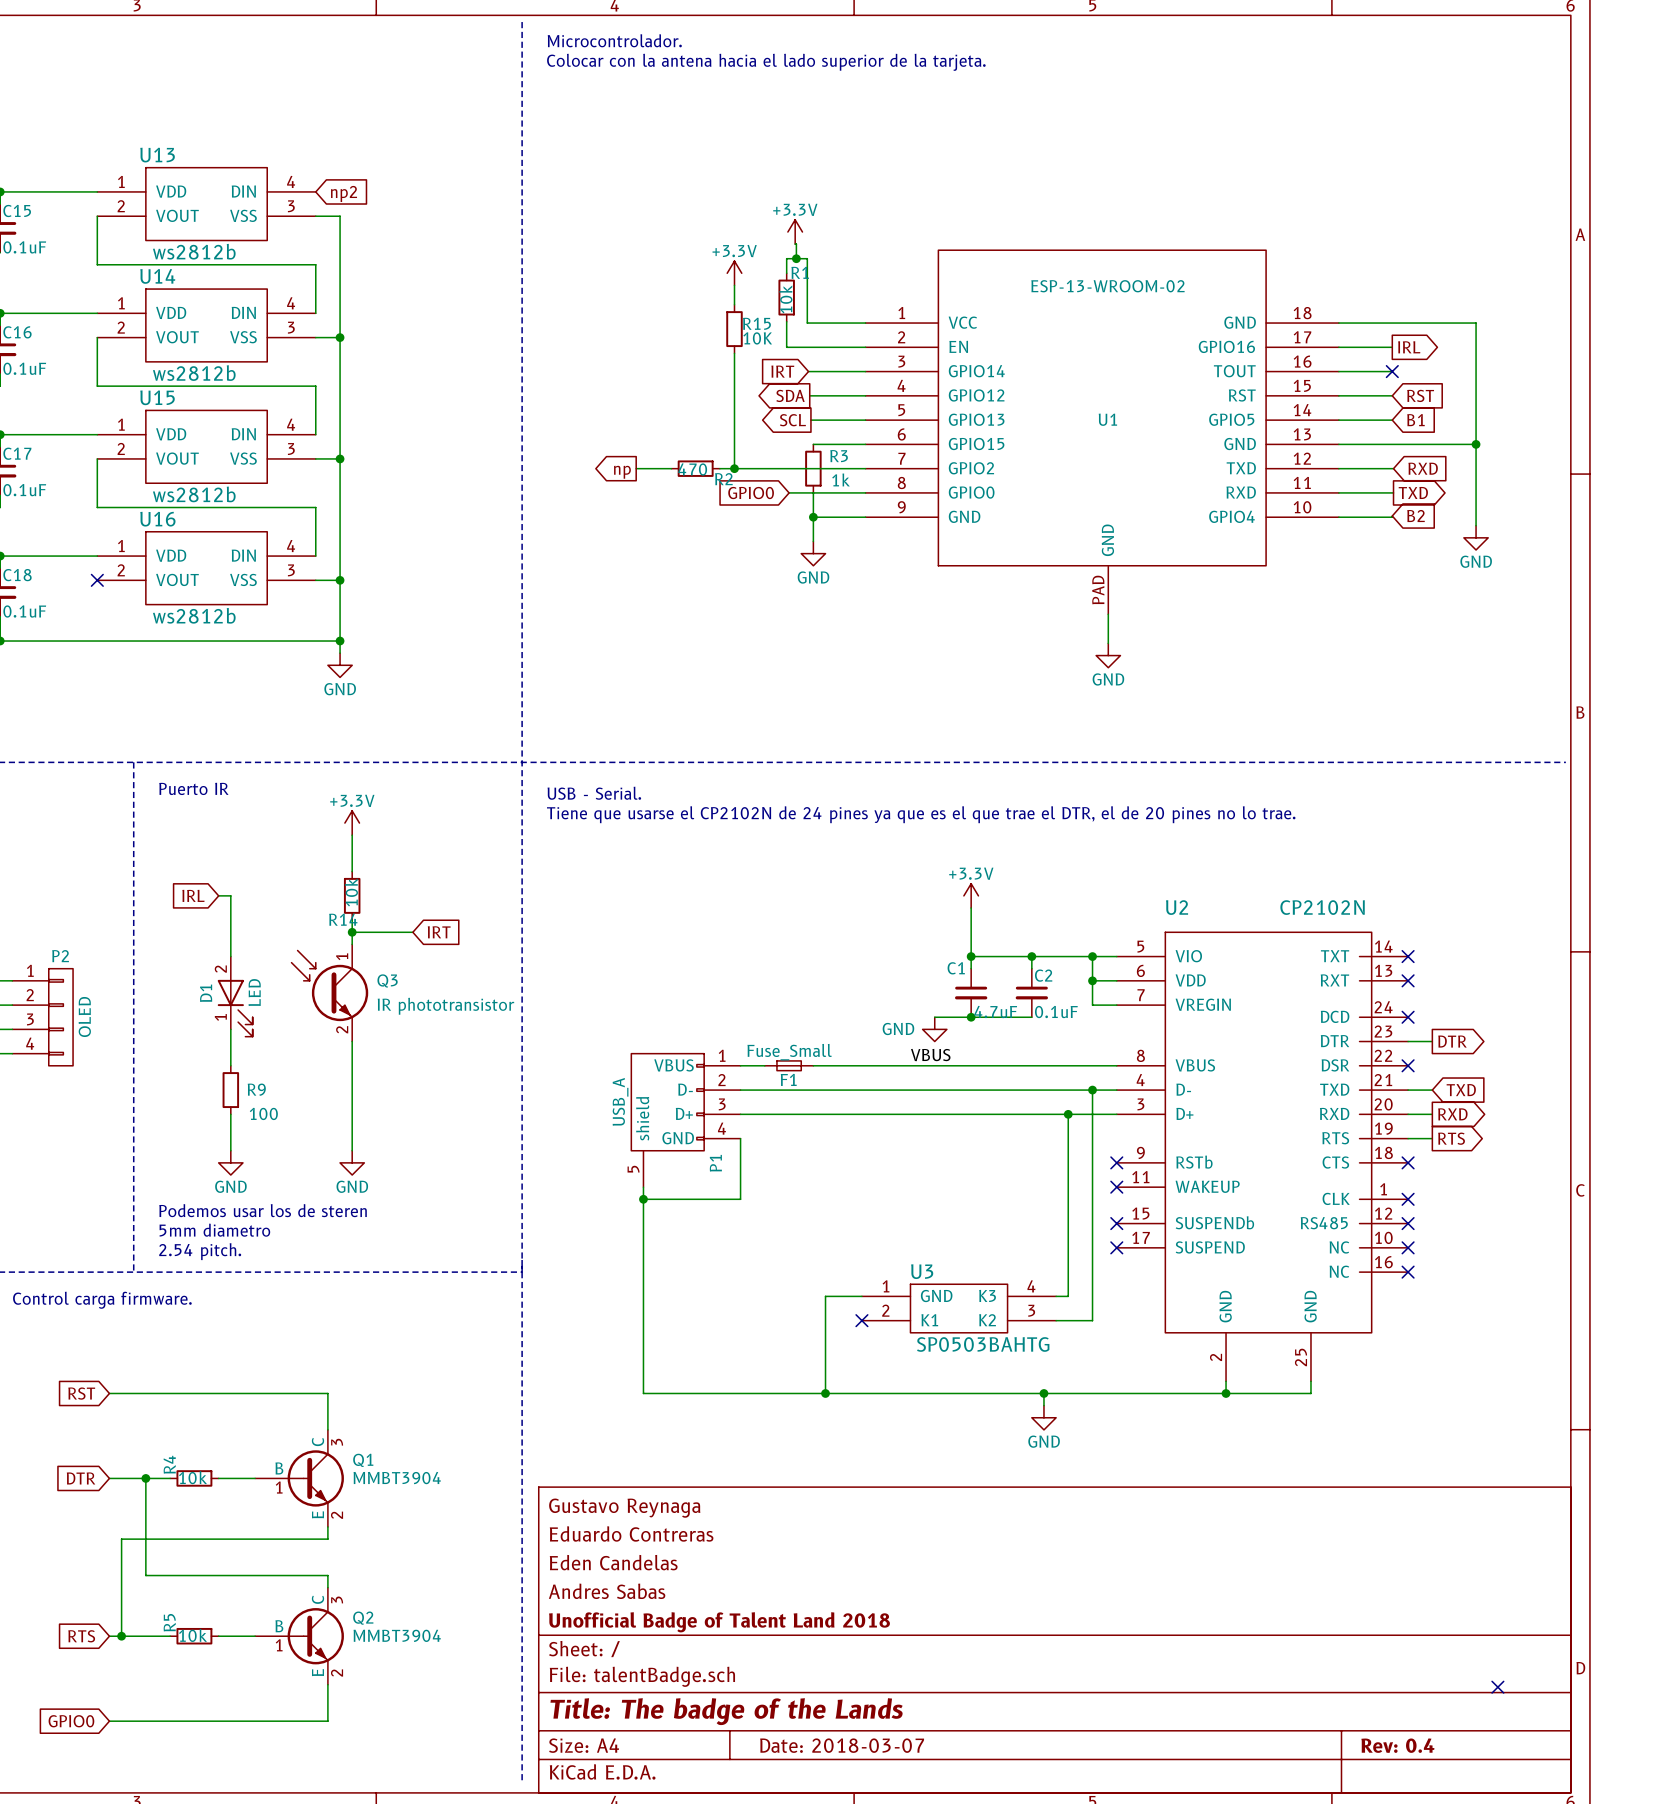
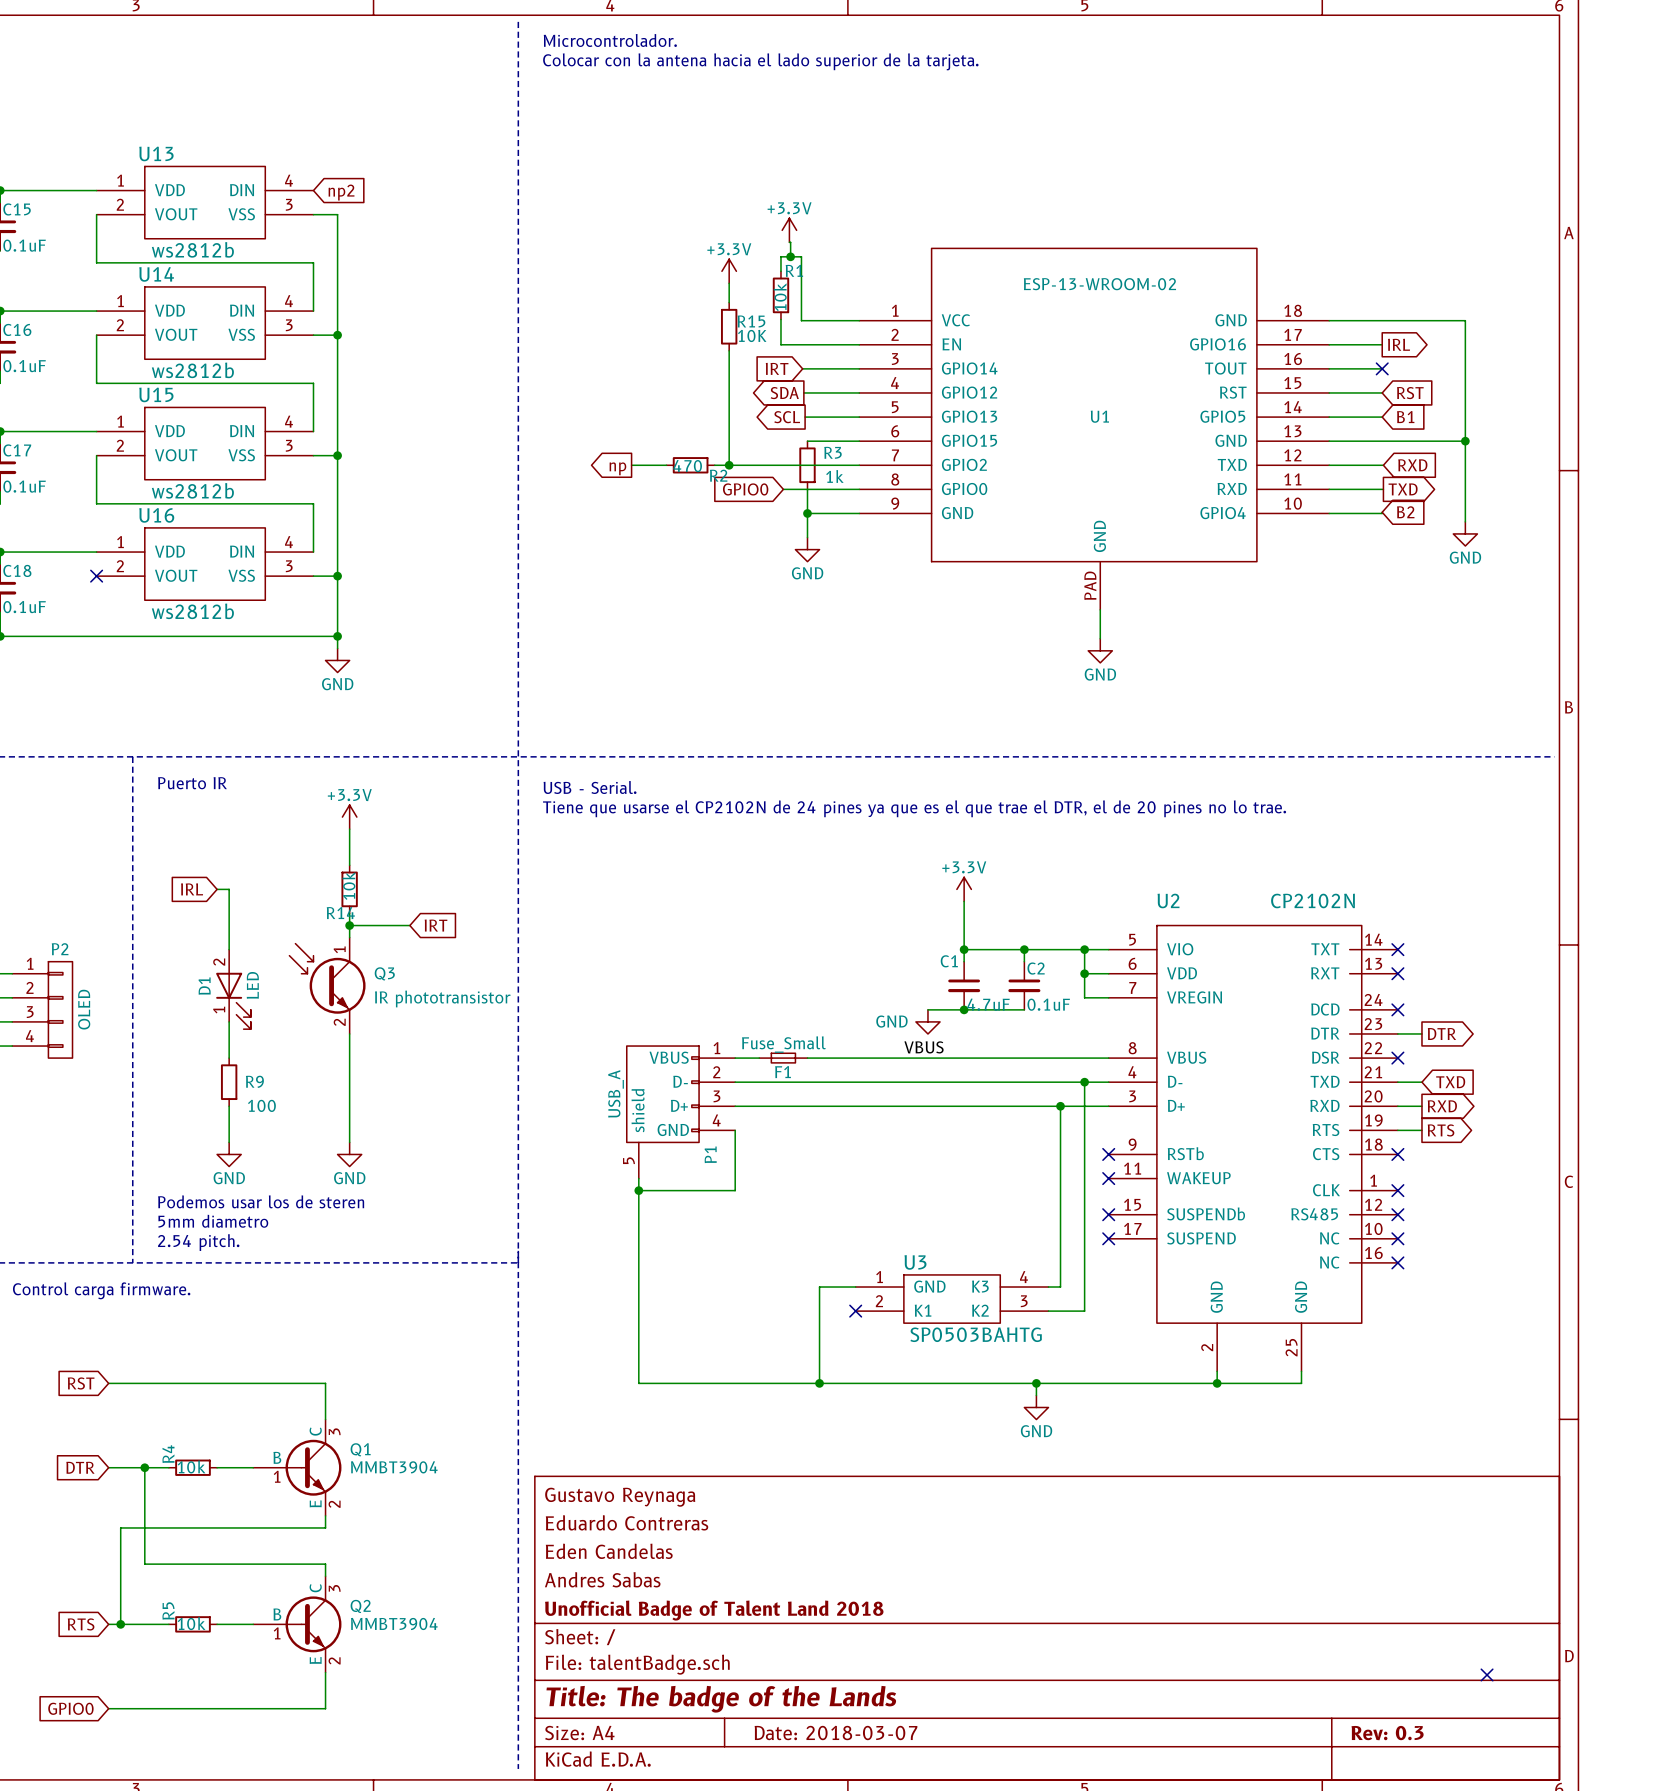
title block: Rev: 0.4 (1397, 1745) -> Rev: 0.3 (1387, 1733)

